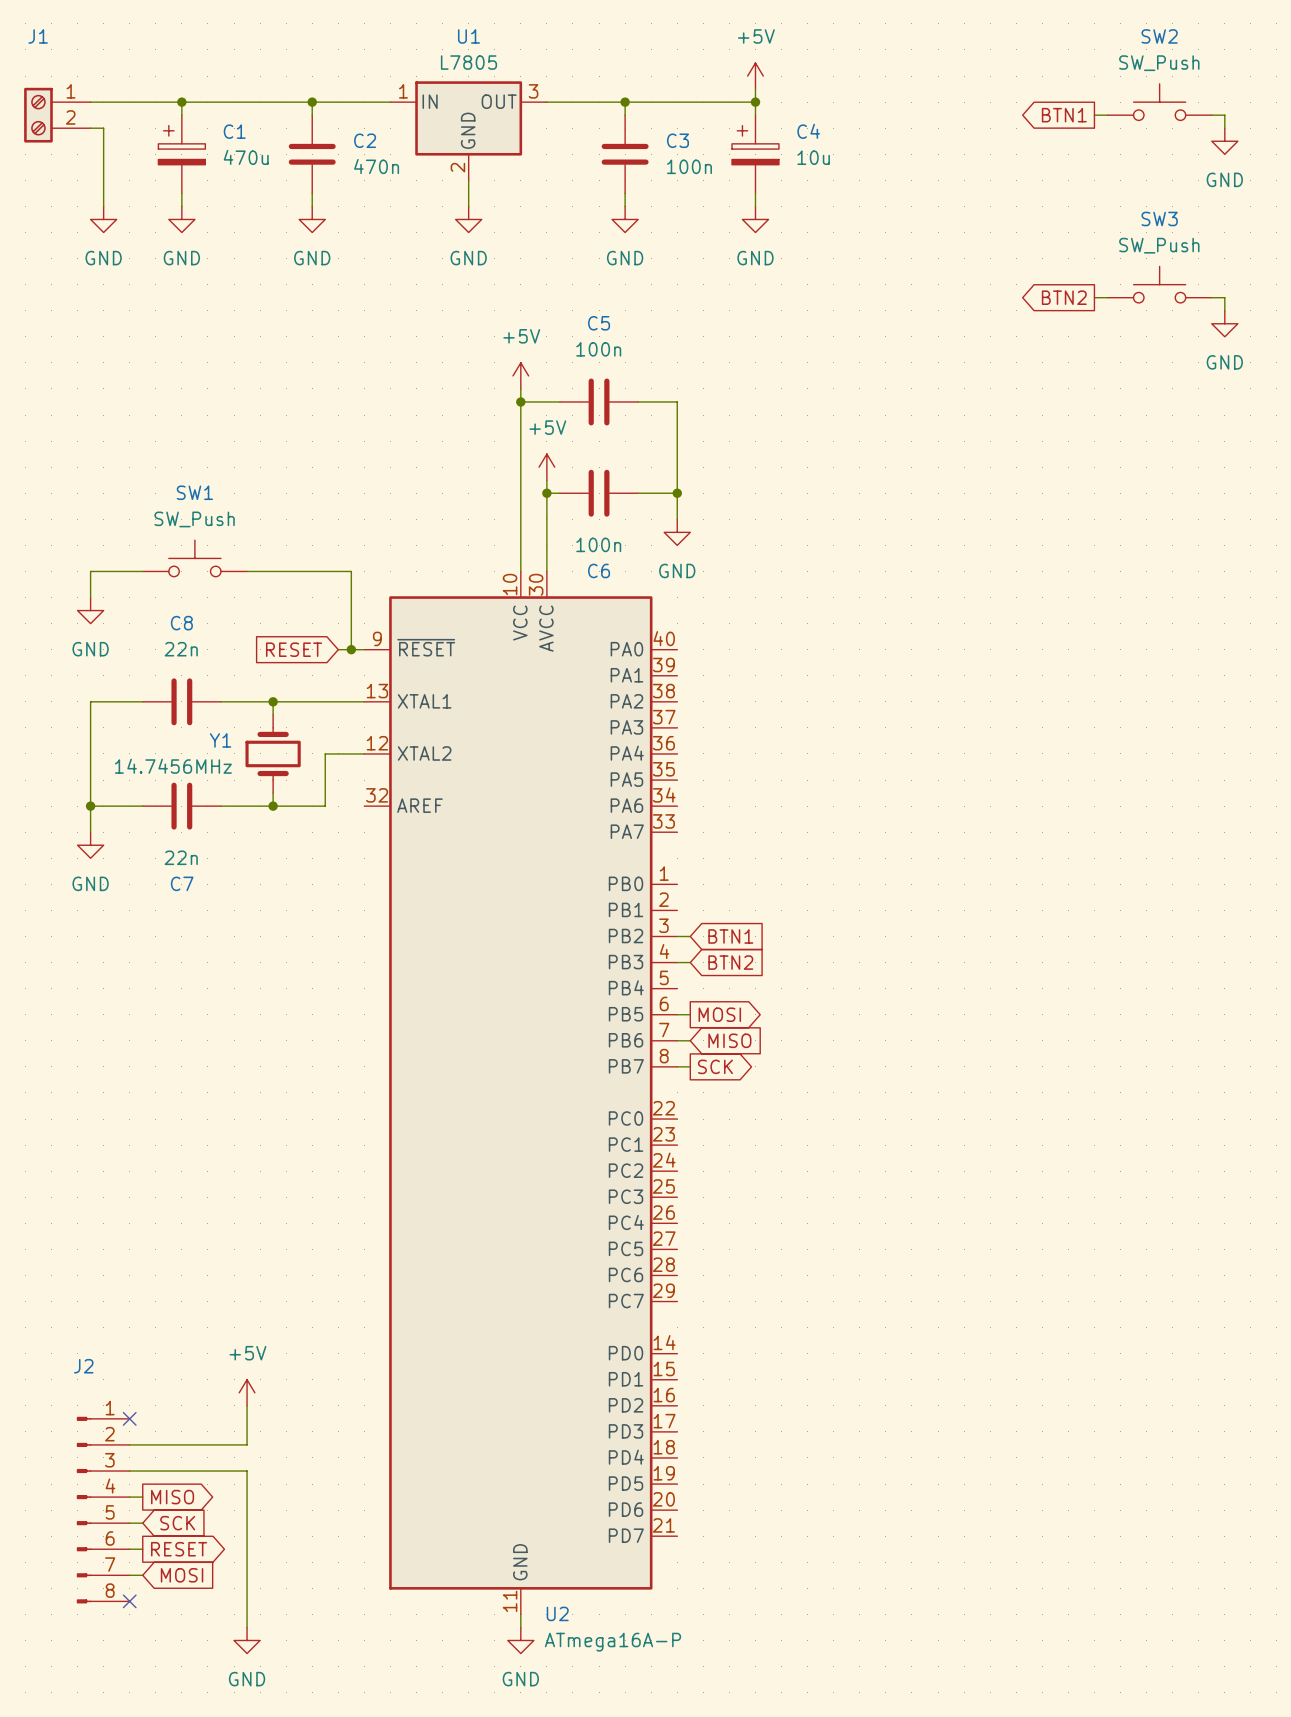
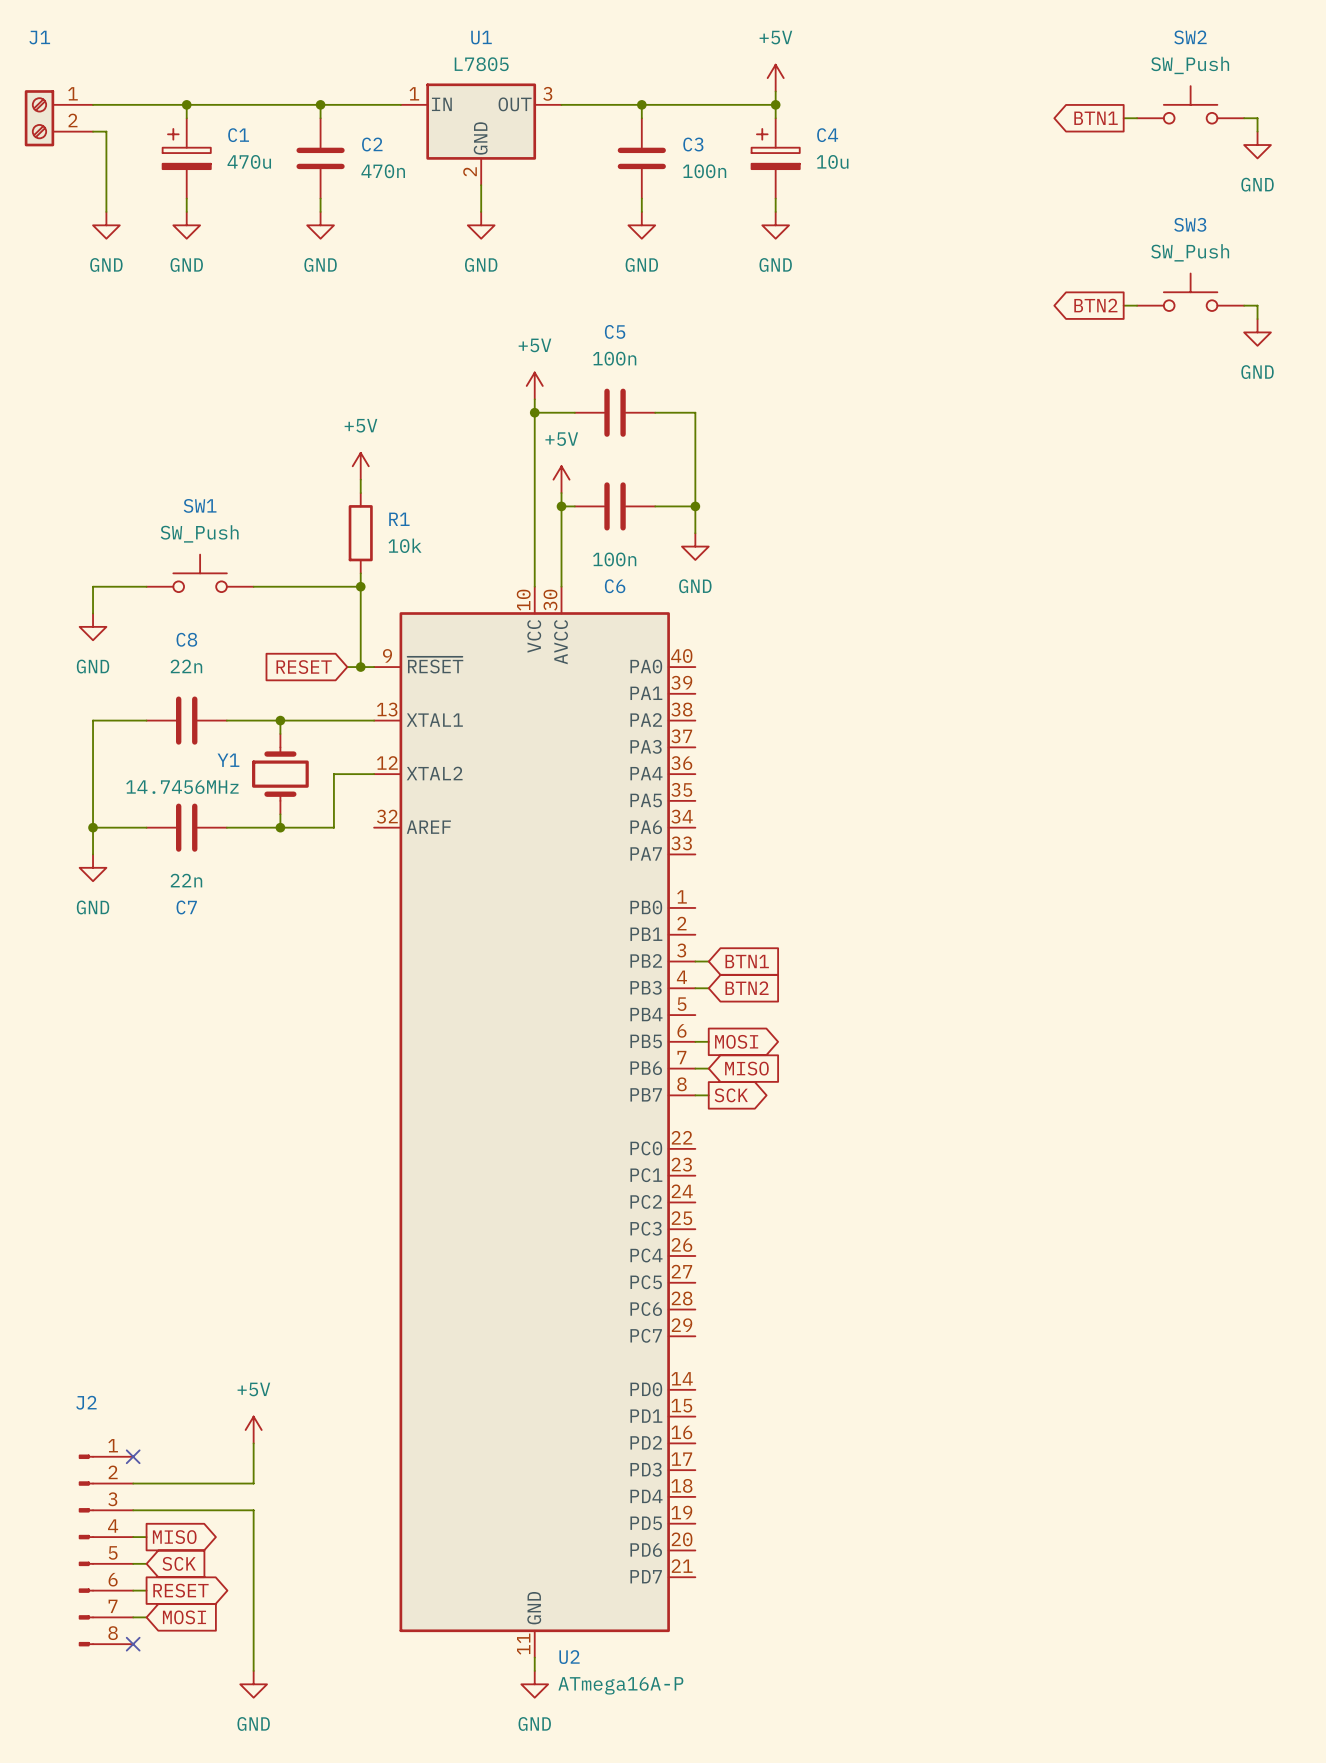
power symbol: none -> +5V (360, 466)
wire: none -> (360, 479) (360, 493)
R1: none -> 10k (360, 533)
wire: none -> (360, 573) (360, 586)
junction: none -> (360, 586)

